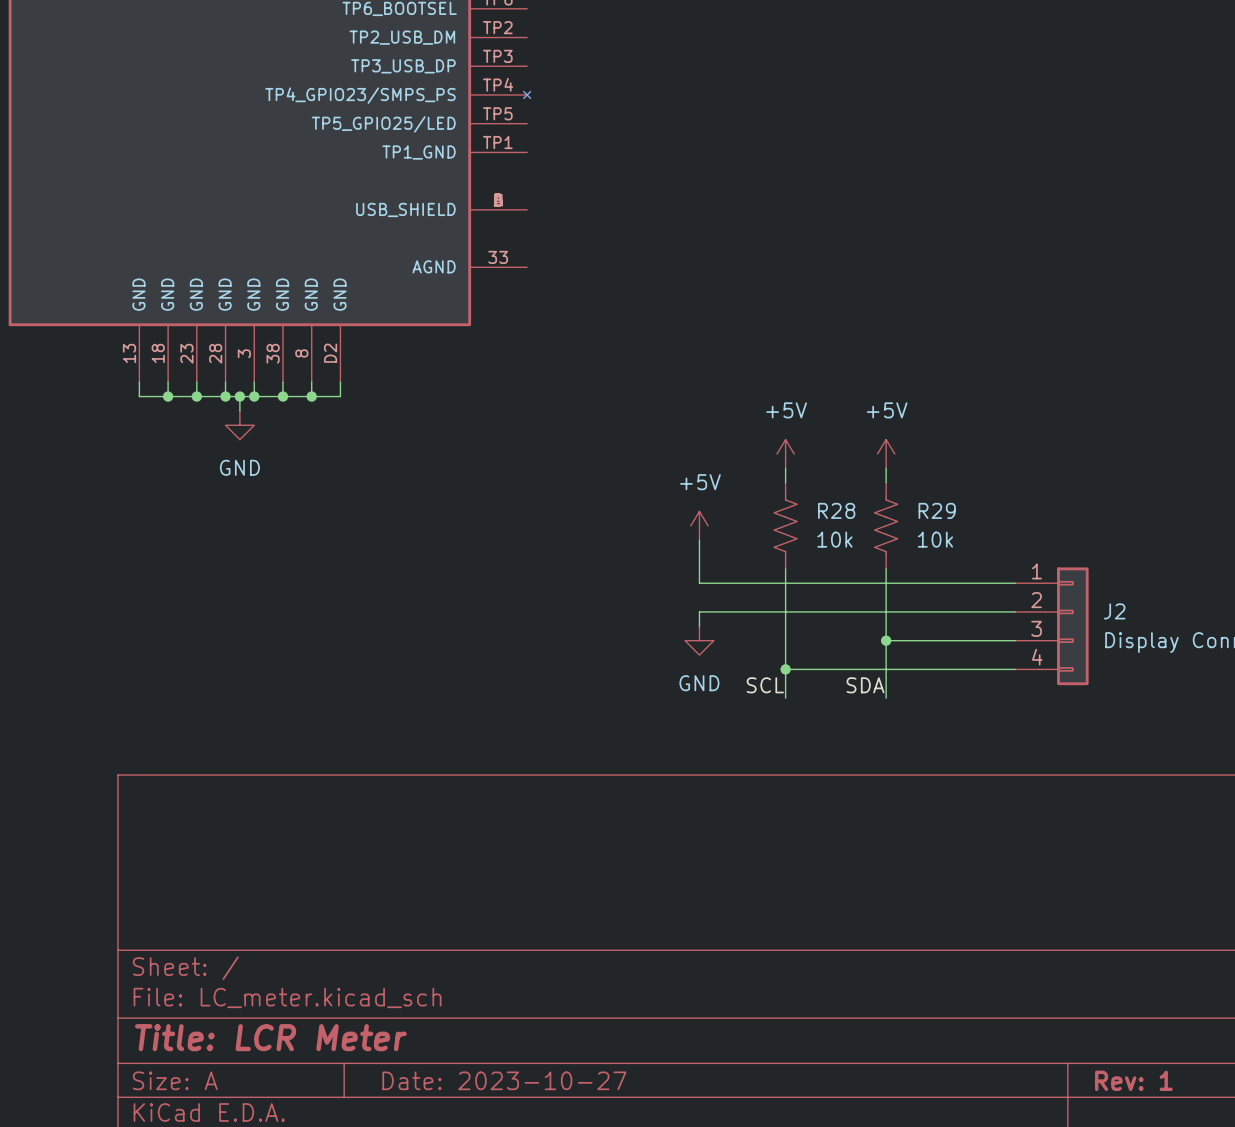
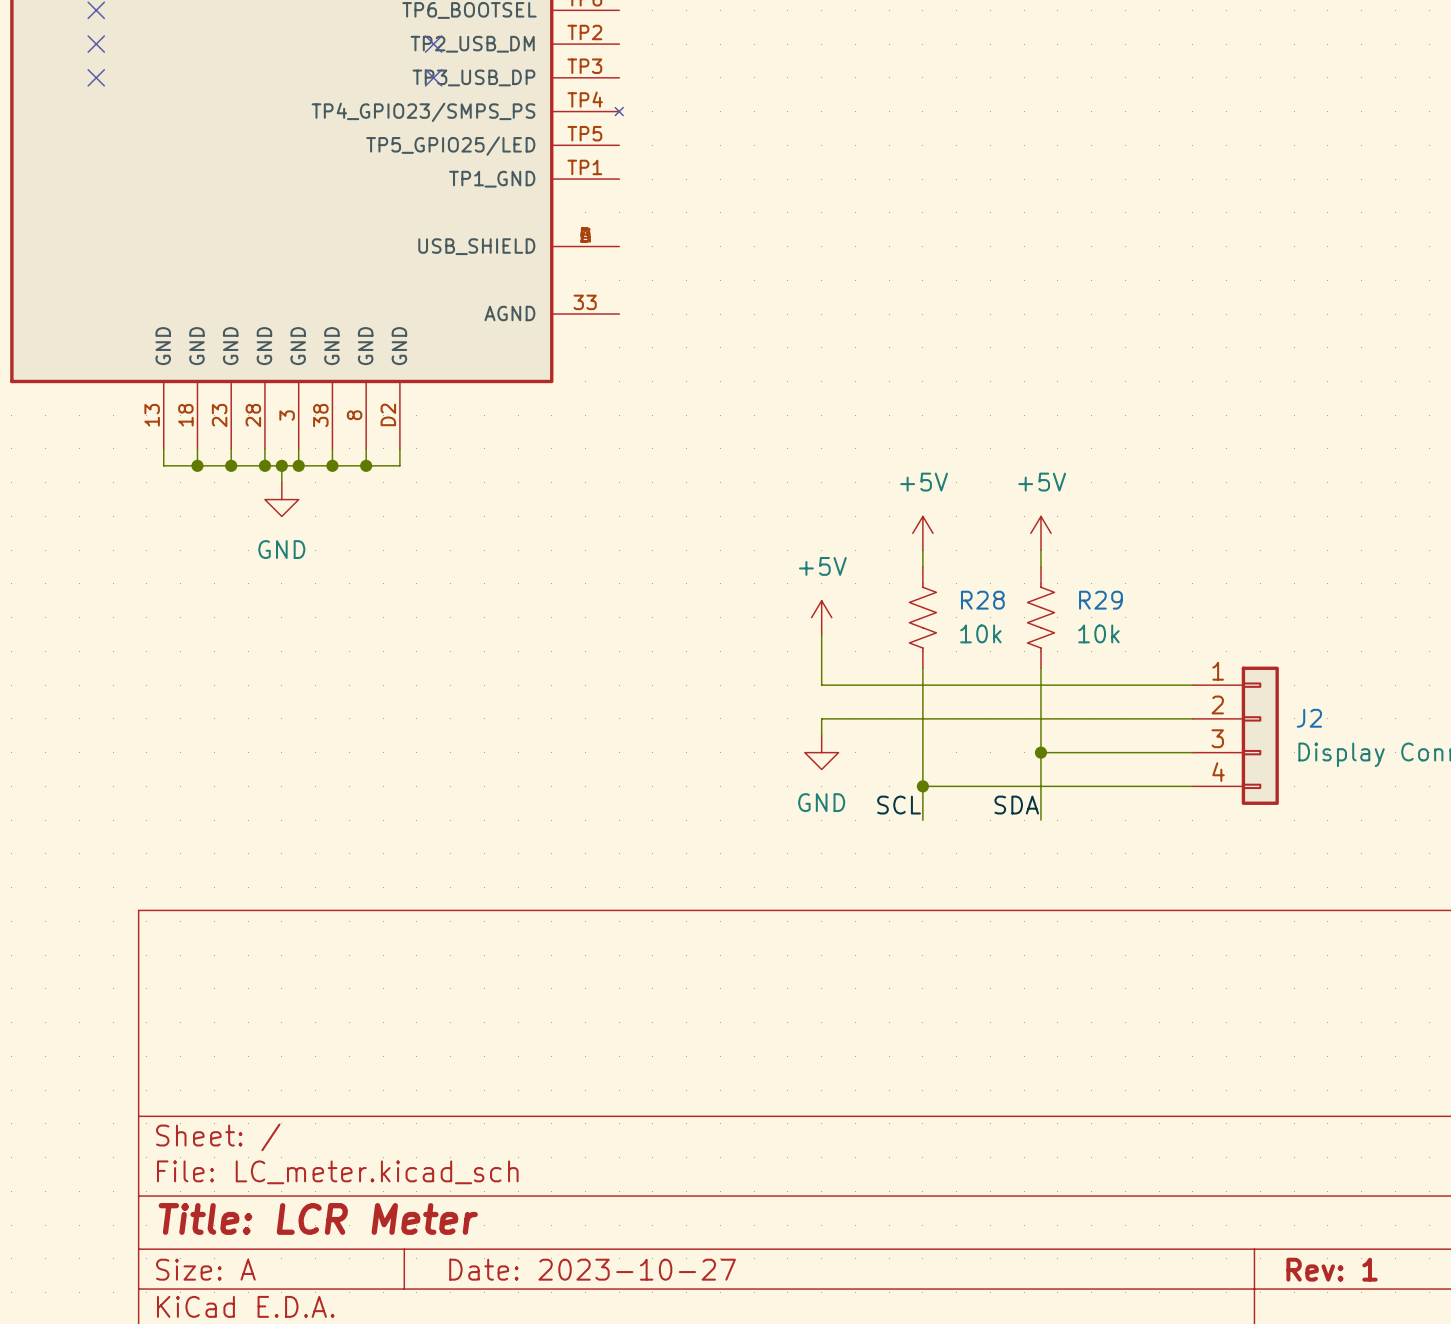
no-connect mark: none -> (96, 10)
no-connect mark: none -> (96, 44)
no-connect mark: none -> (433, 44)
no-connect mark: none -> (96, 77)
no-connect mark: none -> (433, 77)

